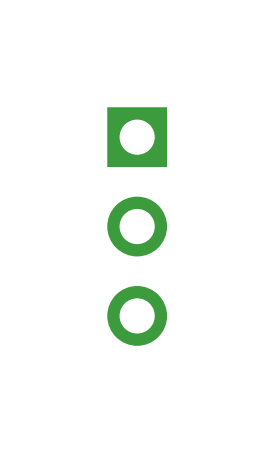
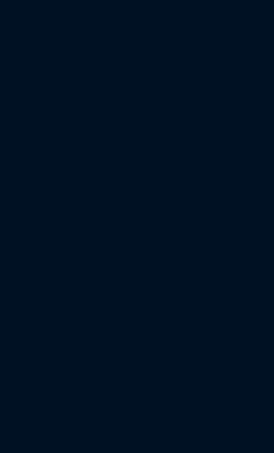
part: (137, 226) -> none

